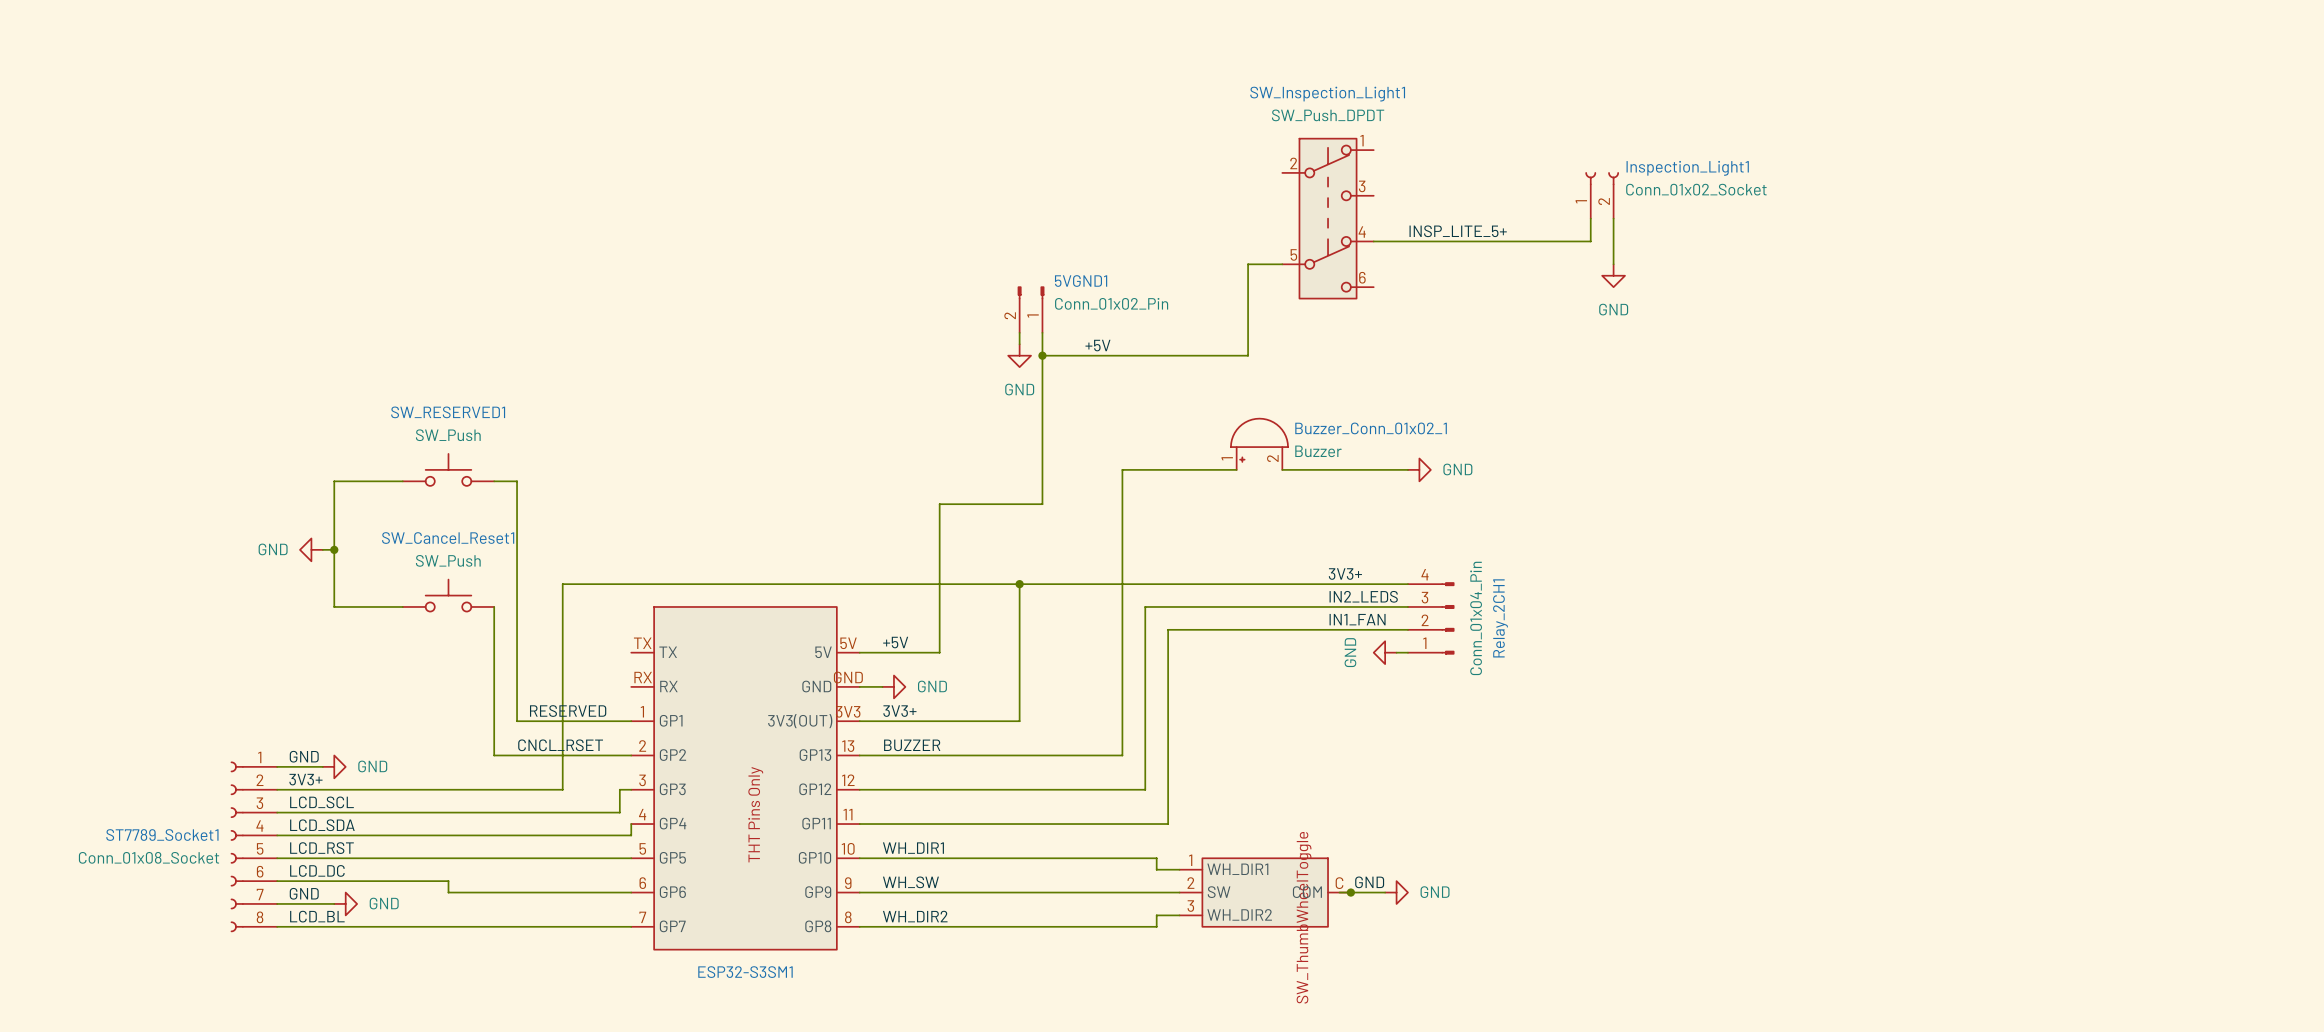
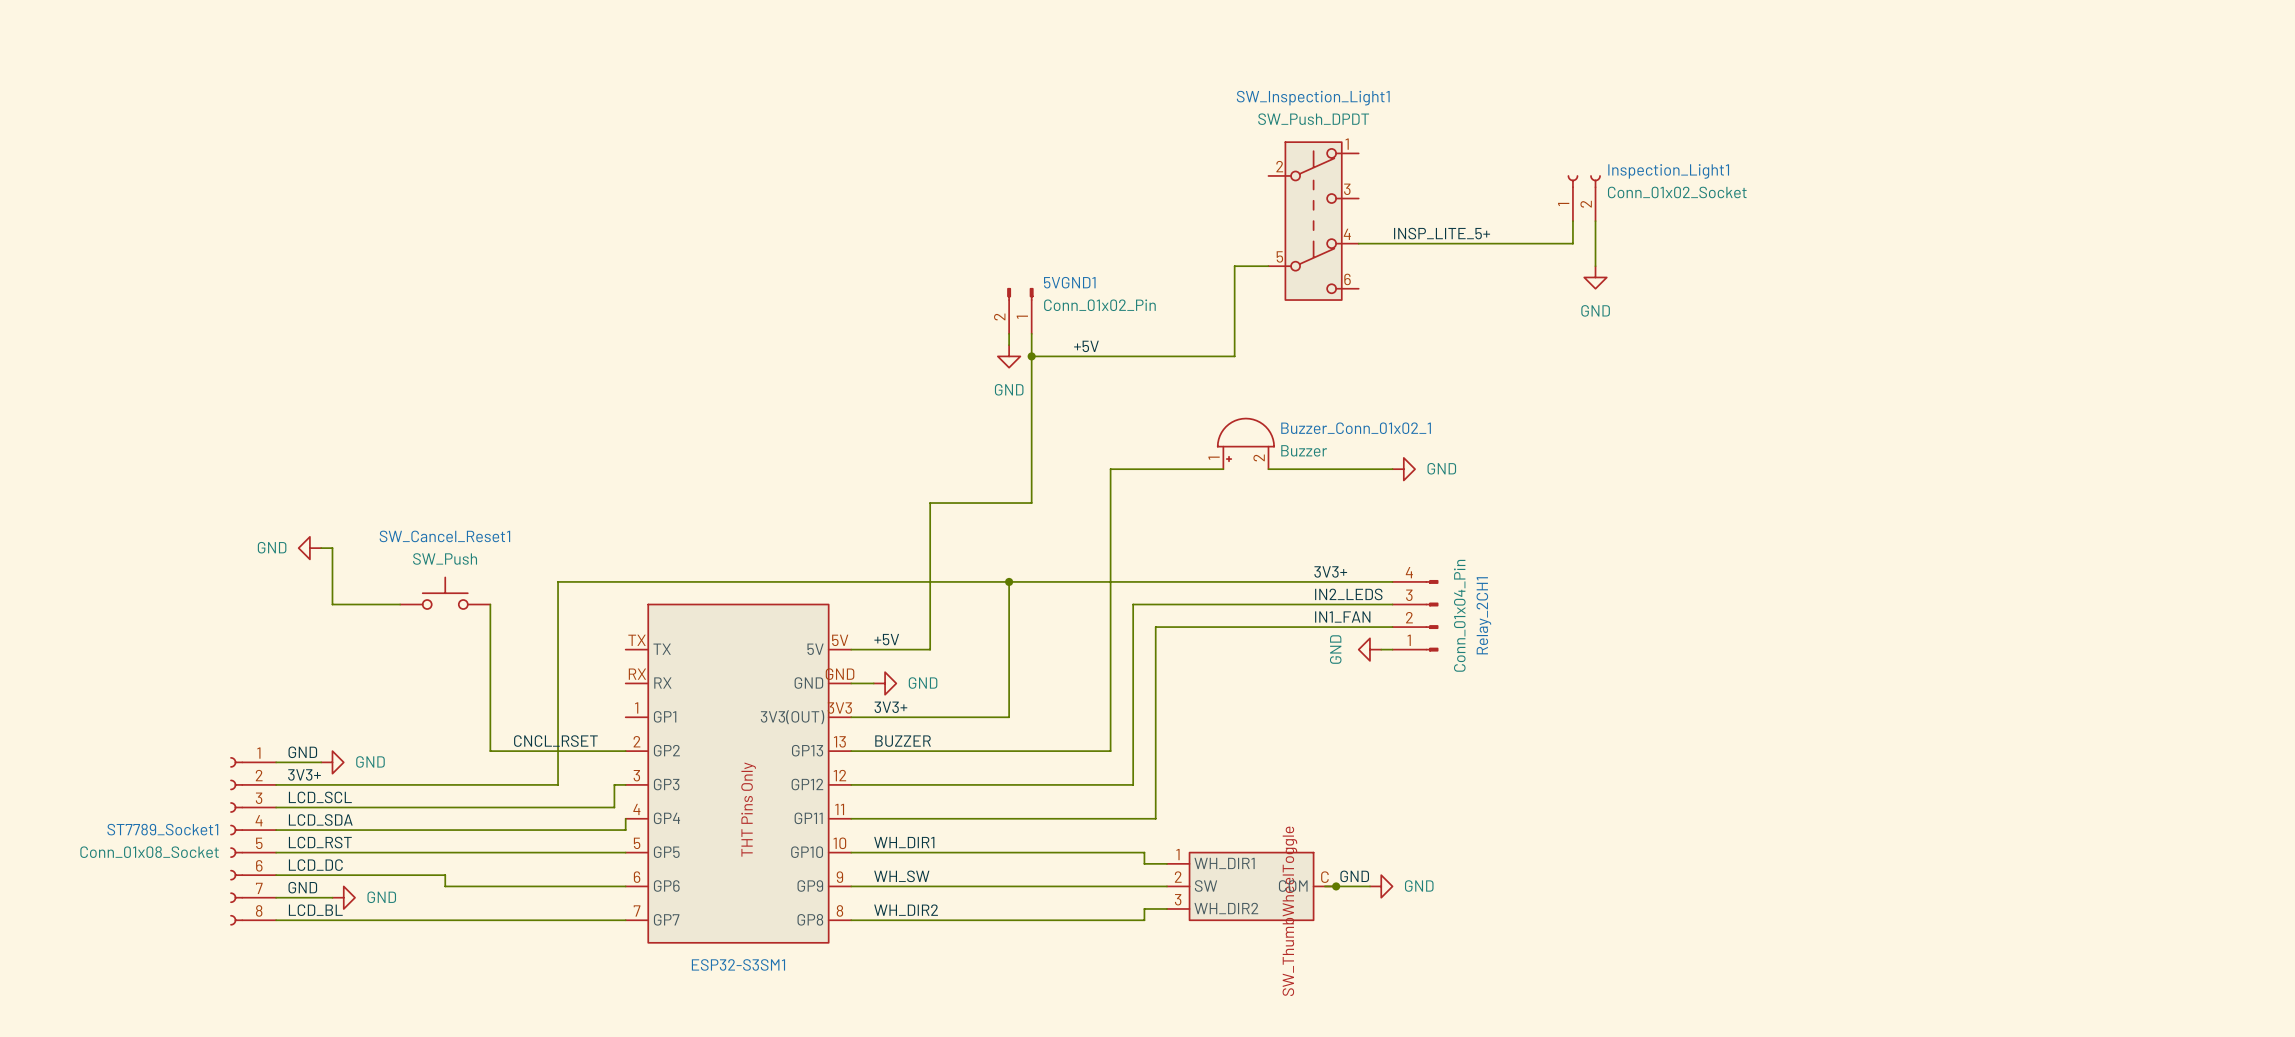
SW_RESERVED1: SW_Push (448, 469) -> none
wire: (402, 481) (334, 481) (334, 549) -> none
wire: (494, 481) (517, 481) (517, 721) (631, 721) -> none
junction: (334, 549) -> none
label: RESERVED (568, 711) -> none

